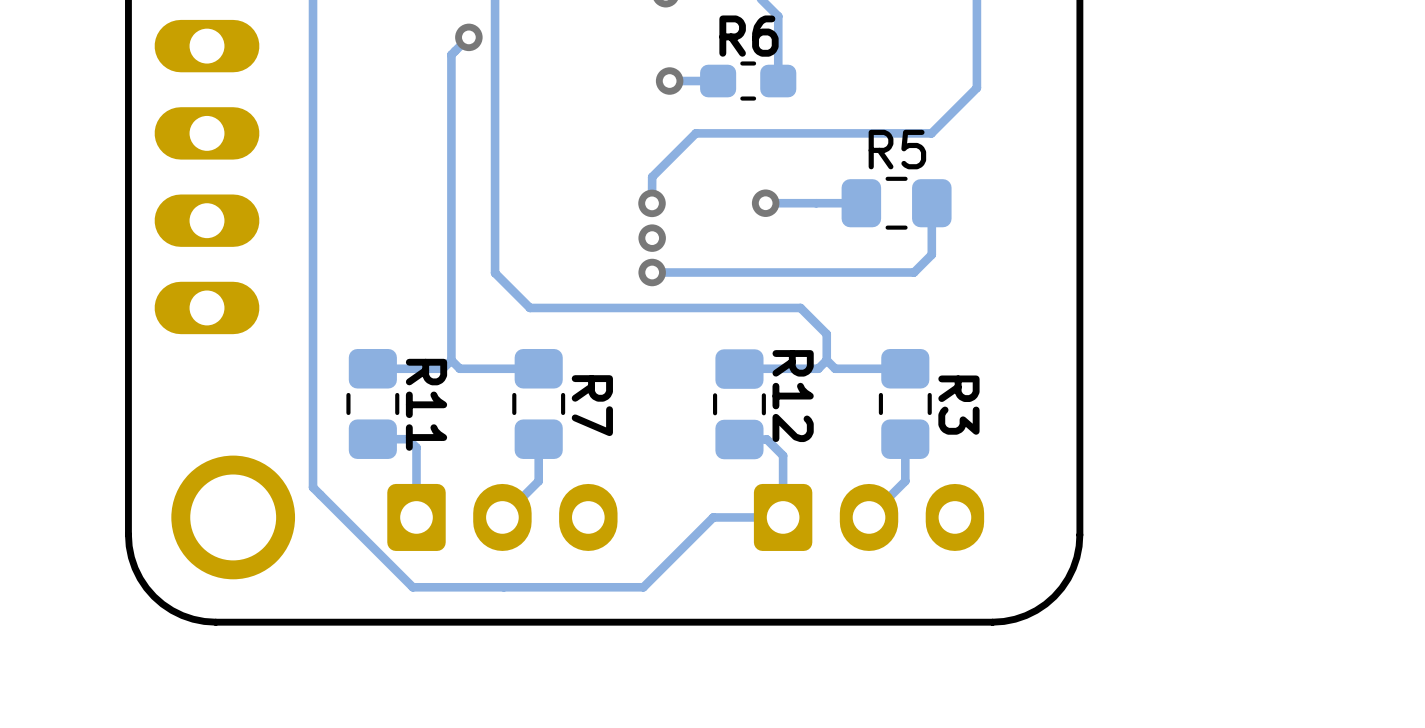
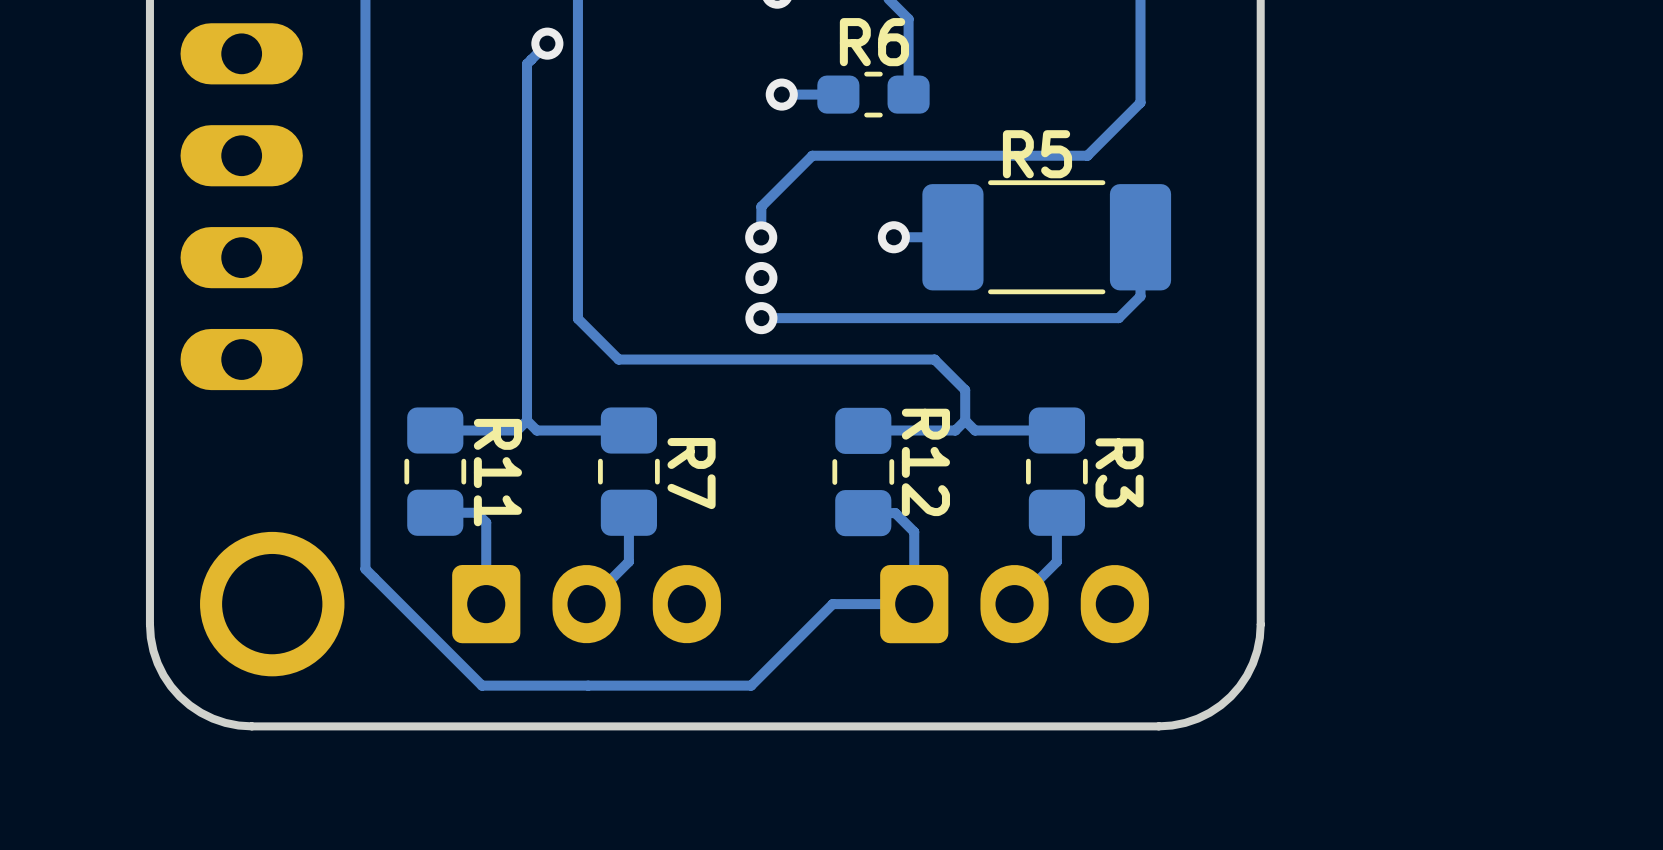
R5 footprint: [841, 176, 952, 230] -> [922, 180, 1172, 295]
track: (861, 203) (816, 203) -> none
track: (931, 203) (931, 254) (914, 272) -> (1140, 237) (1140, 296) (1118, 318) (1067, 318)

